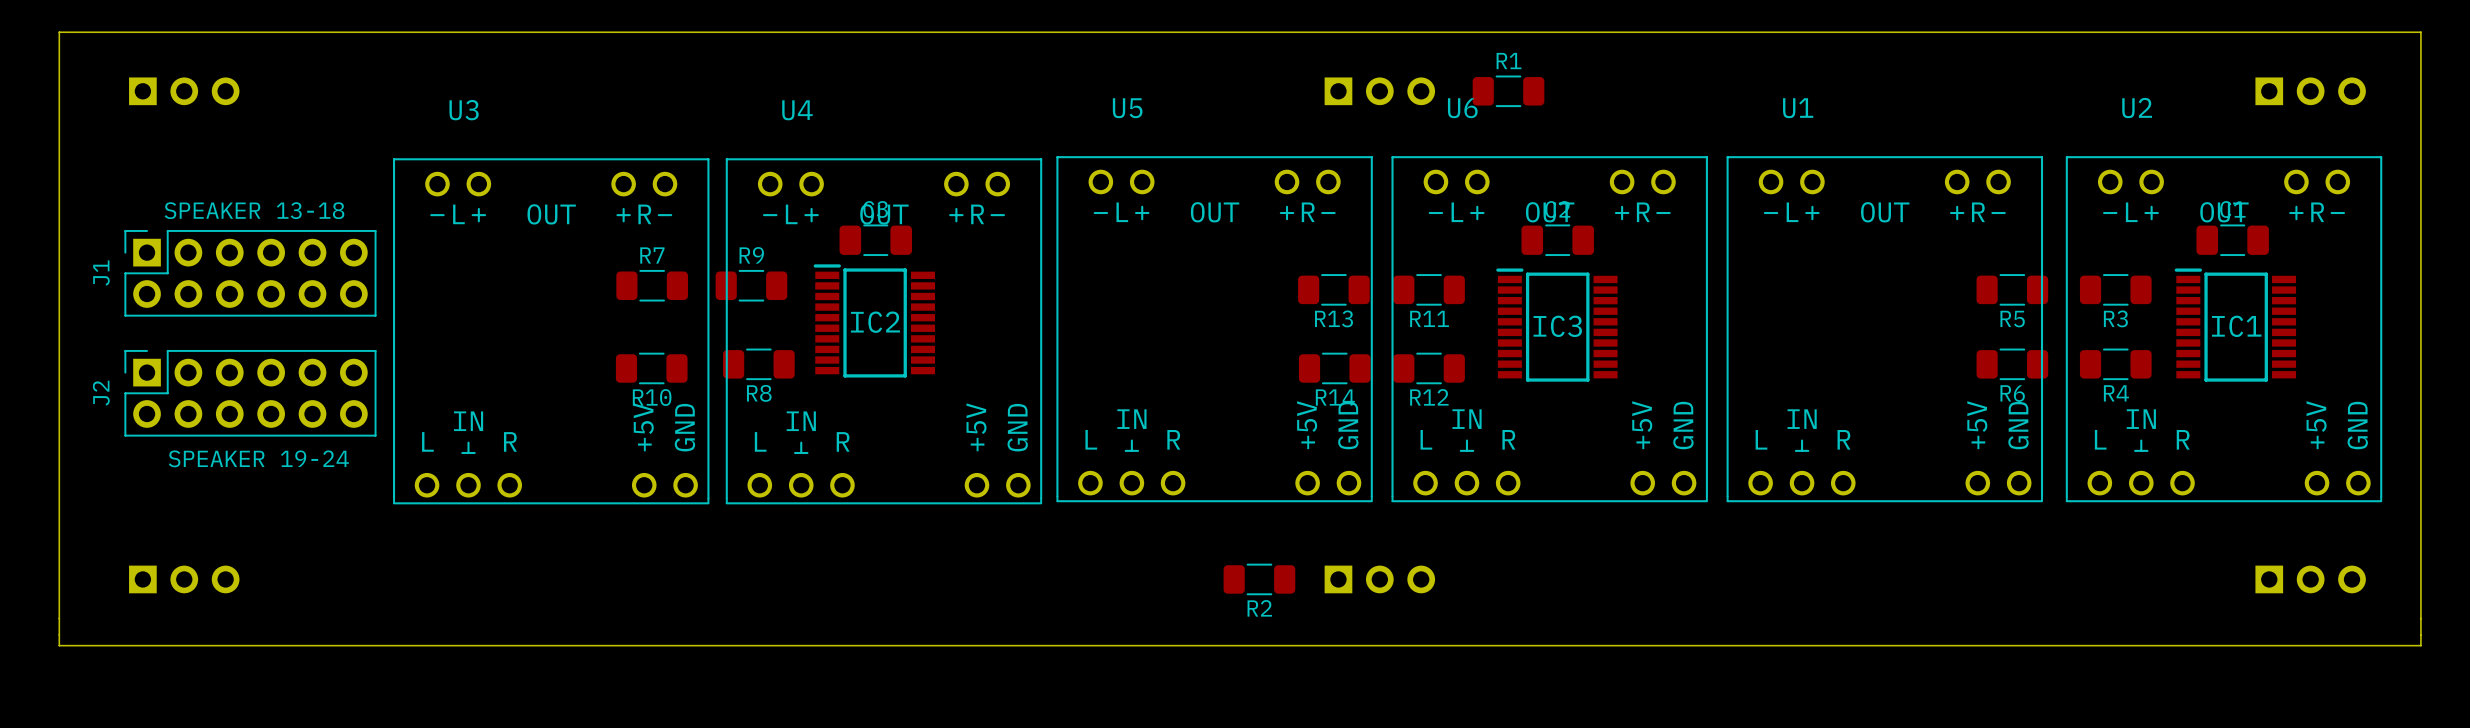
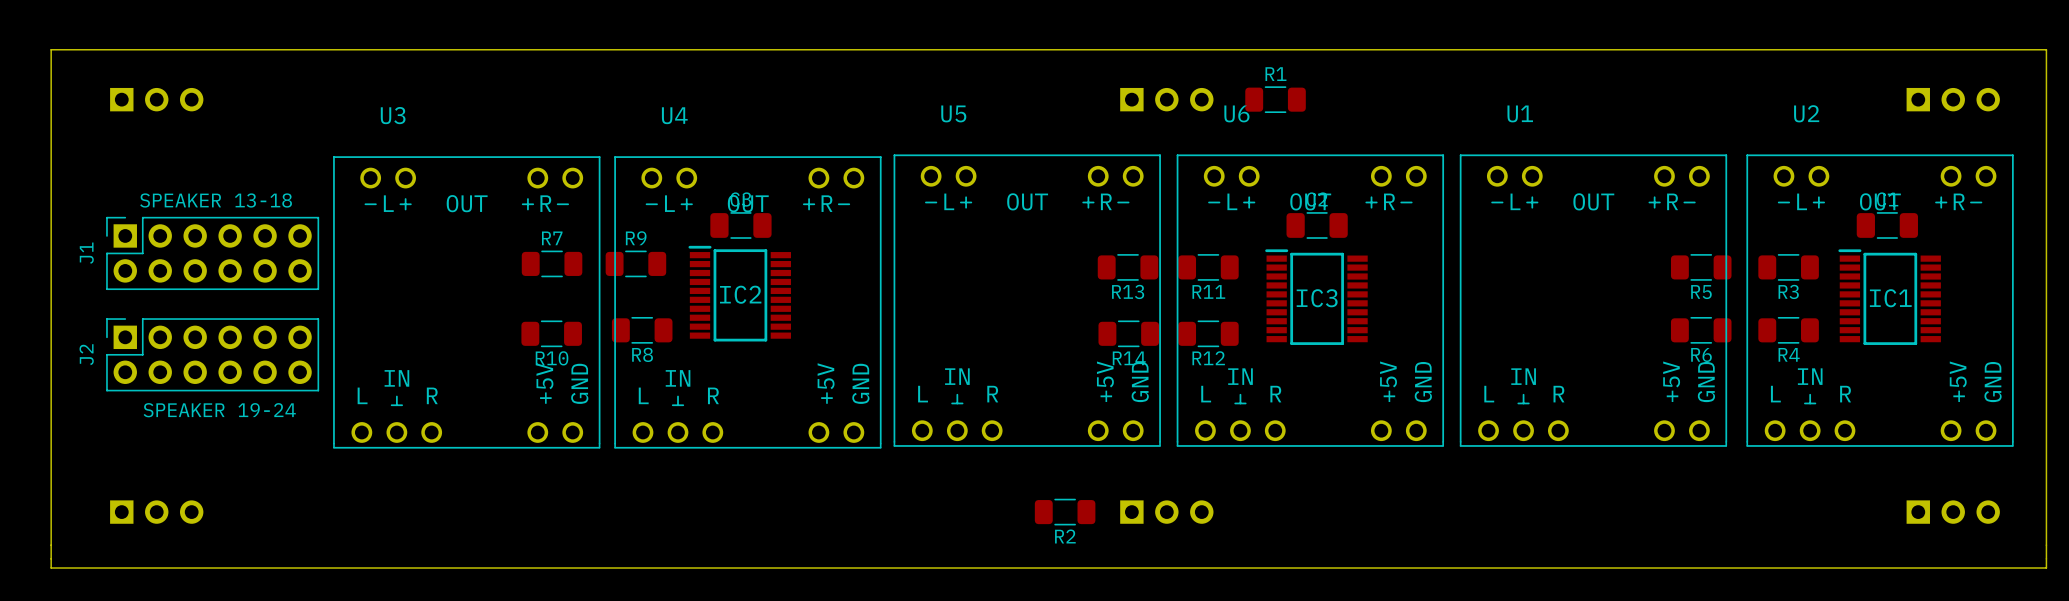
U5 footprint: [1056, 156, 1373, 503] -> [893, 154, 1161, 447]
U6 footprint: [1391, 156, 1708, 503] -> [1176, 154, 1445, 447]
U1 footprint: [1726, 156, 2044, 503] -> [1459, 154, 1728, 447]
U2 footprint: [2065, 156, 2383, 503] -> [1746, 154, 2014, 447]
U3 footprint: [392, 158, 710, 505] -> [332, 156, 601, 449]
U4 footprint: [725, 158, 1043, 505] -> [614, 156, 882, 449]

